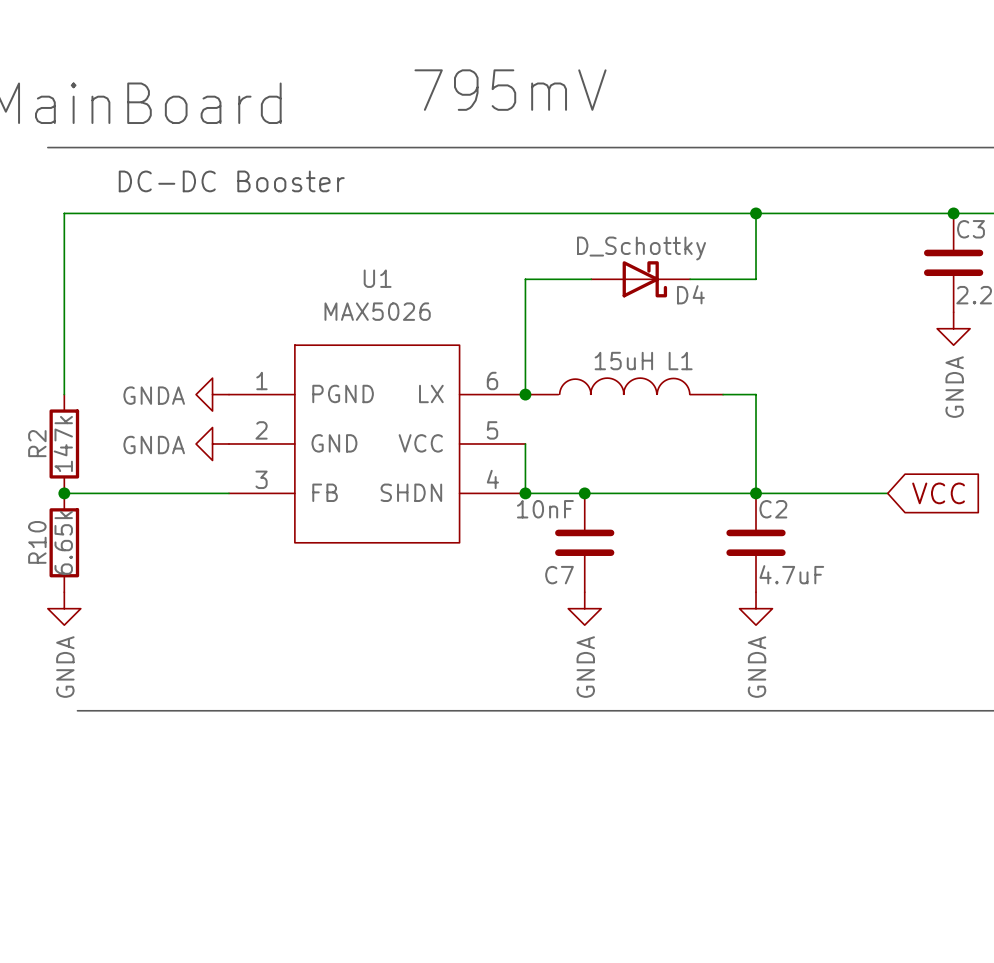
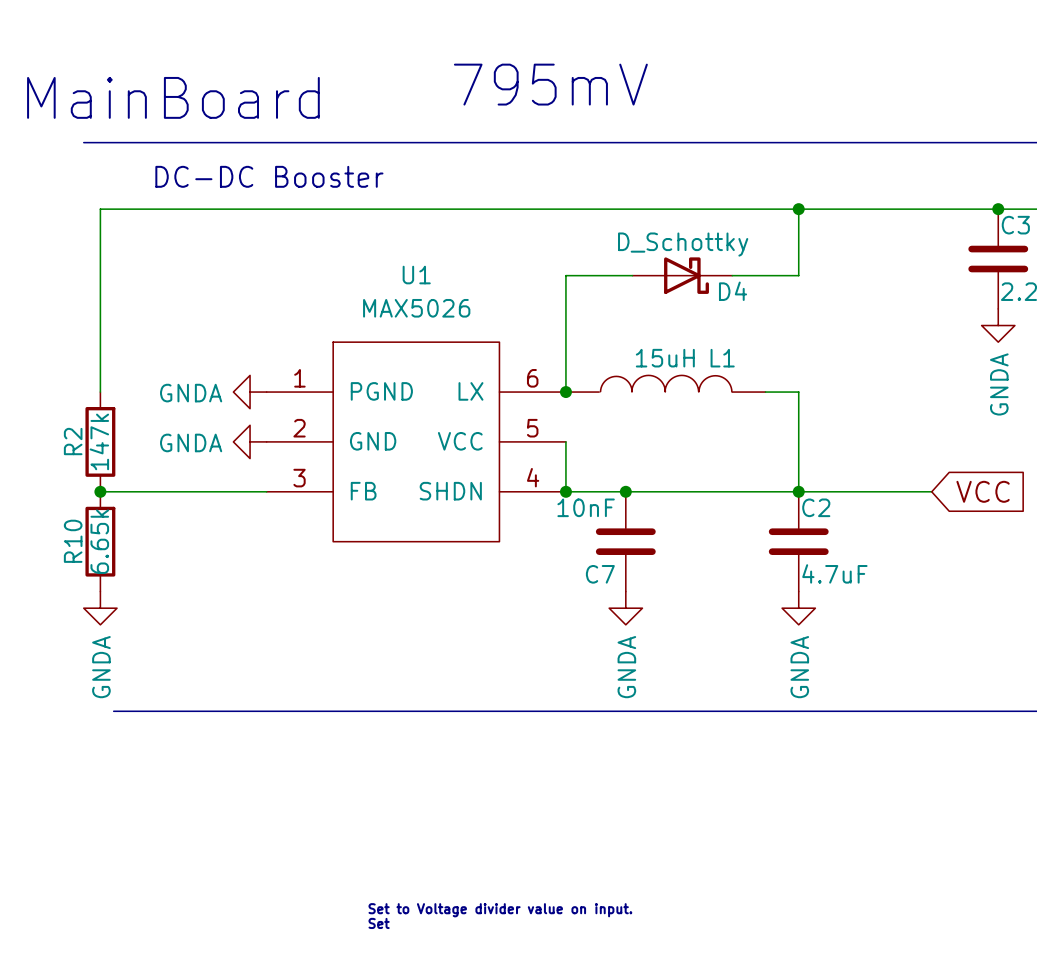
text: none -> Set to Voltage divider value on input. (500, 910)
text: none -> Set (379, 923)

